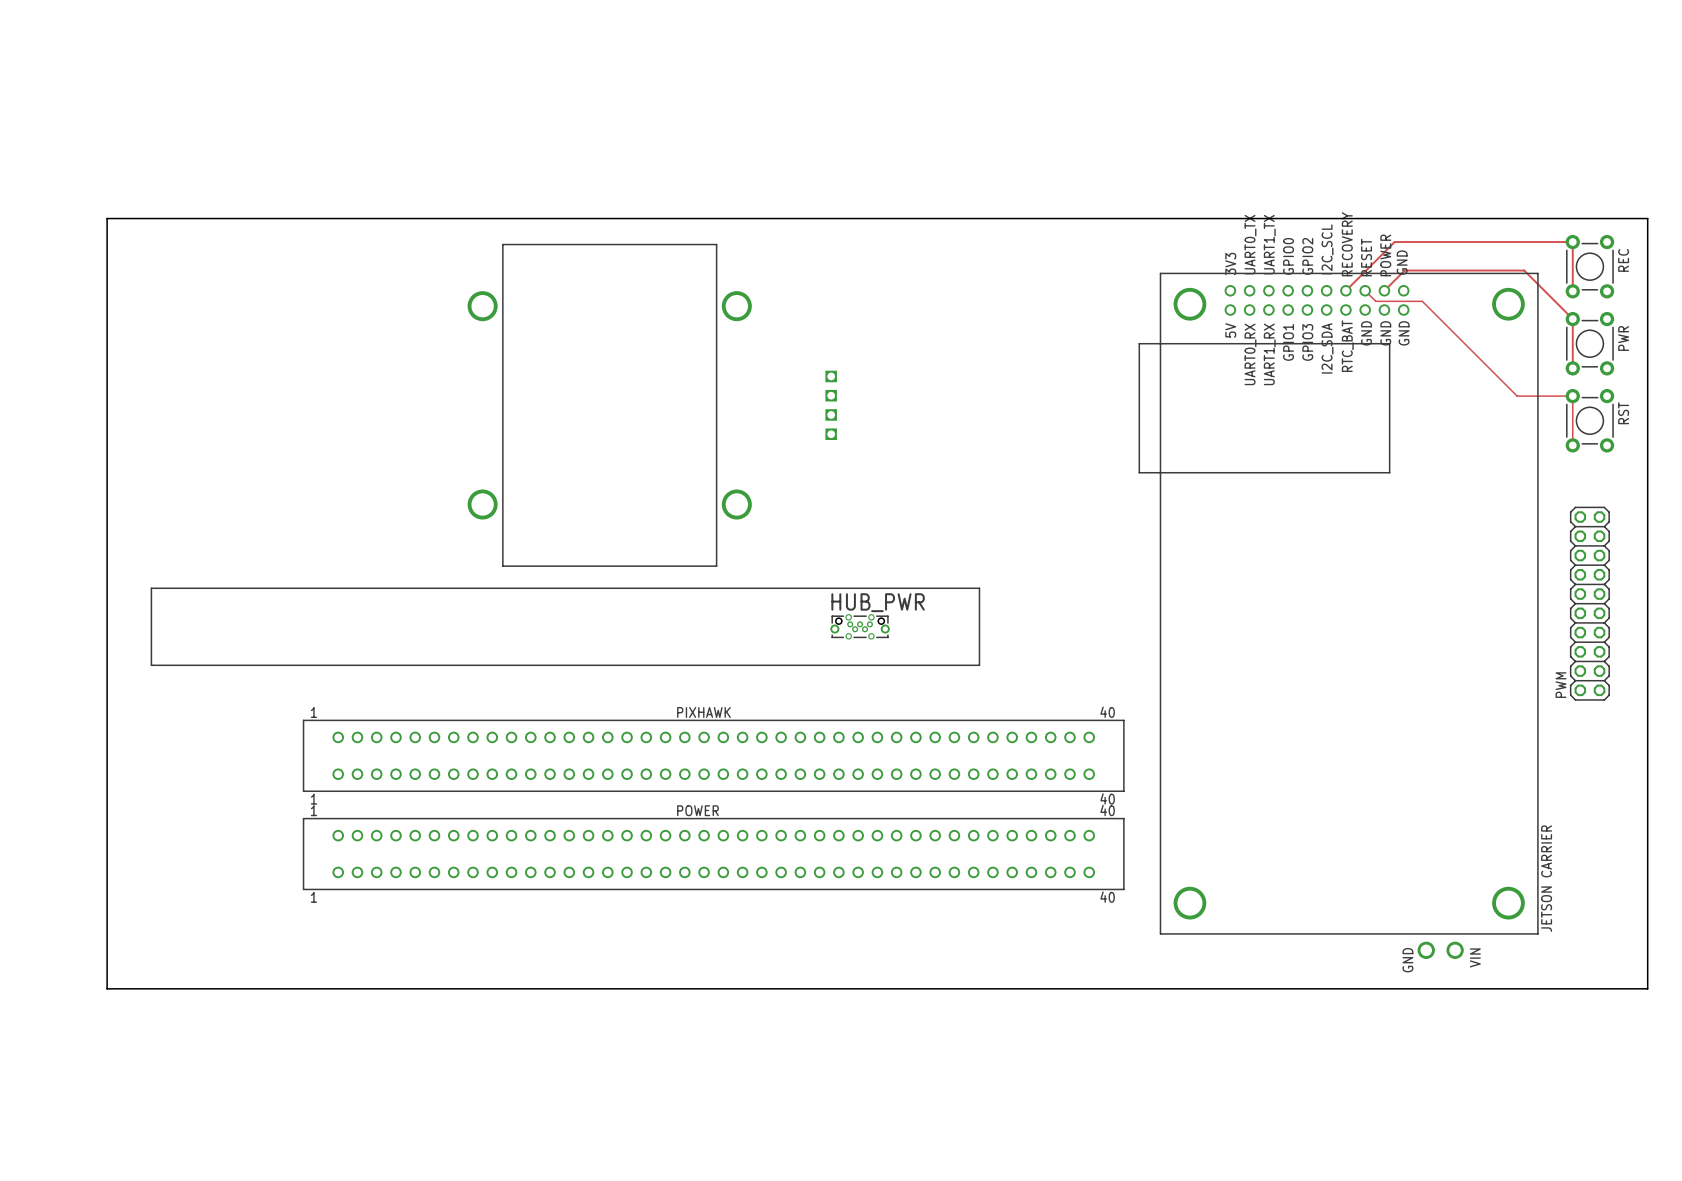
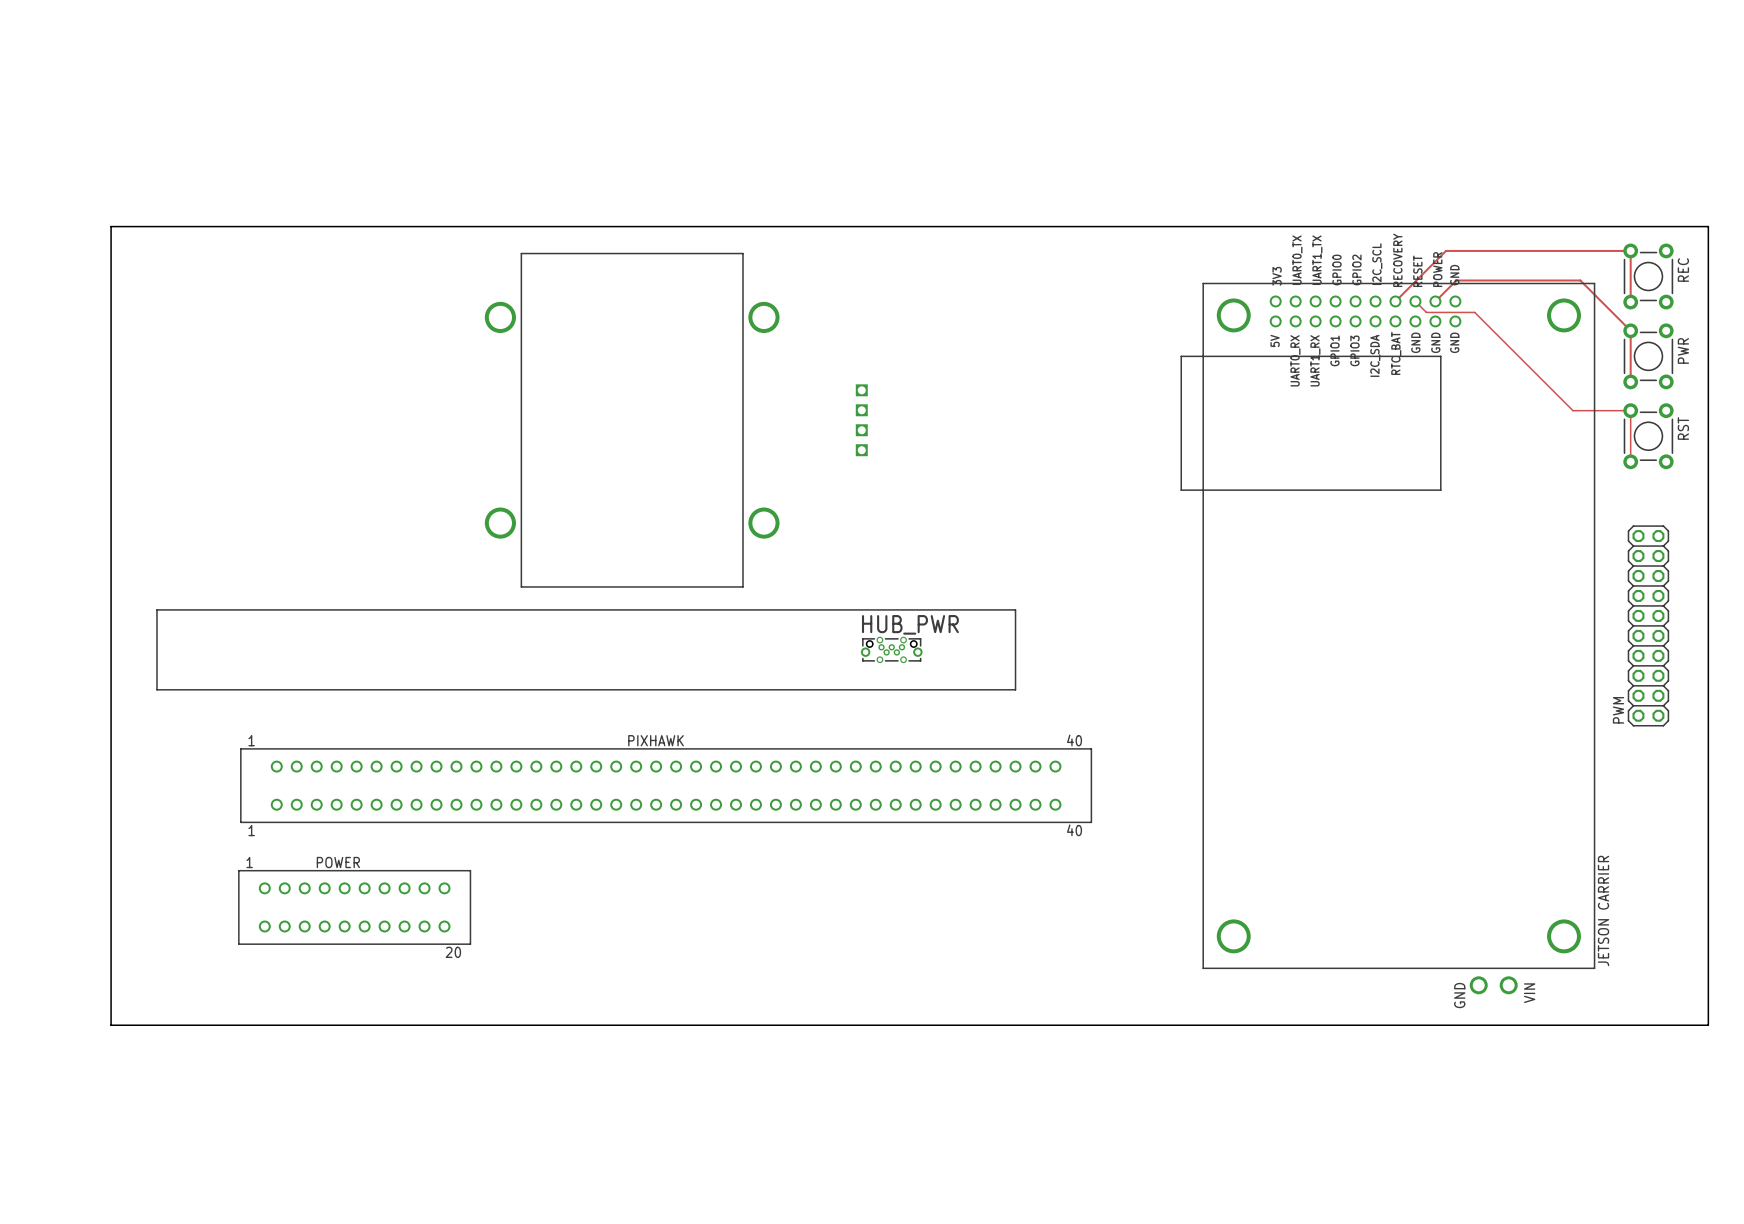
part footprint: [1138, 272, 1539, 959] -> [1180, 282, 1596, 995]
PIXHAWK position: (713, 755) -> (666, 785)
POWER: (713, 854) -> none
POWER: none -> (354, 907)

